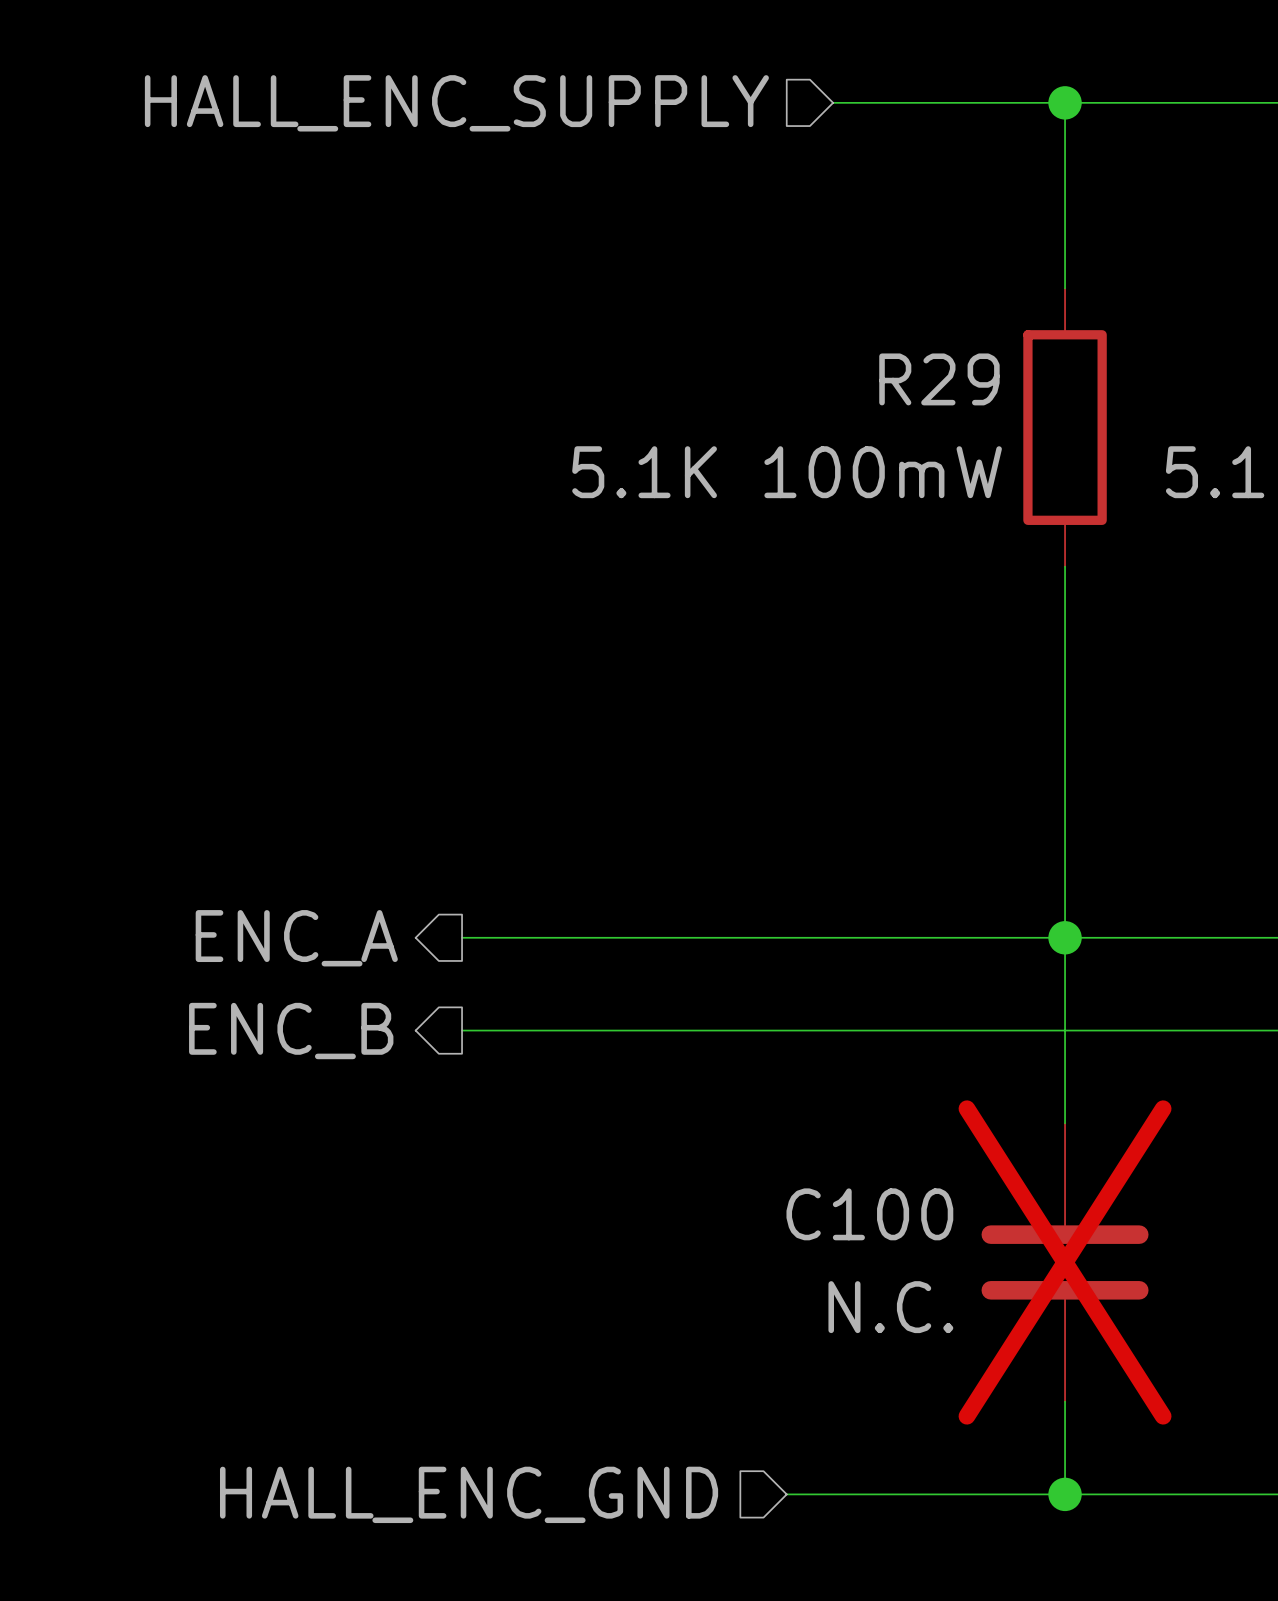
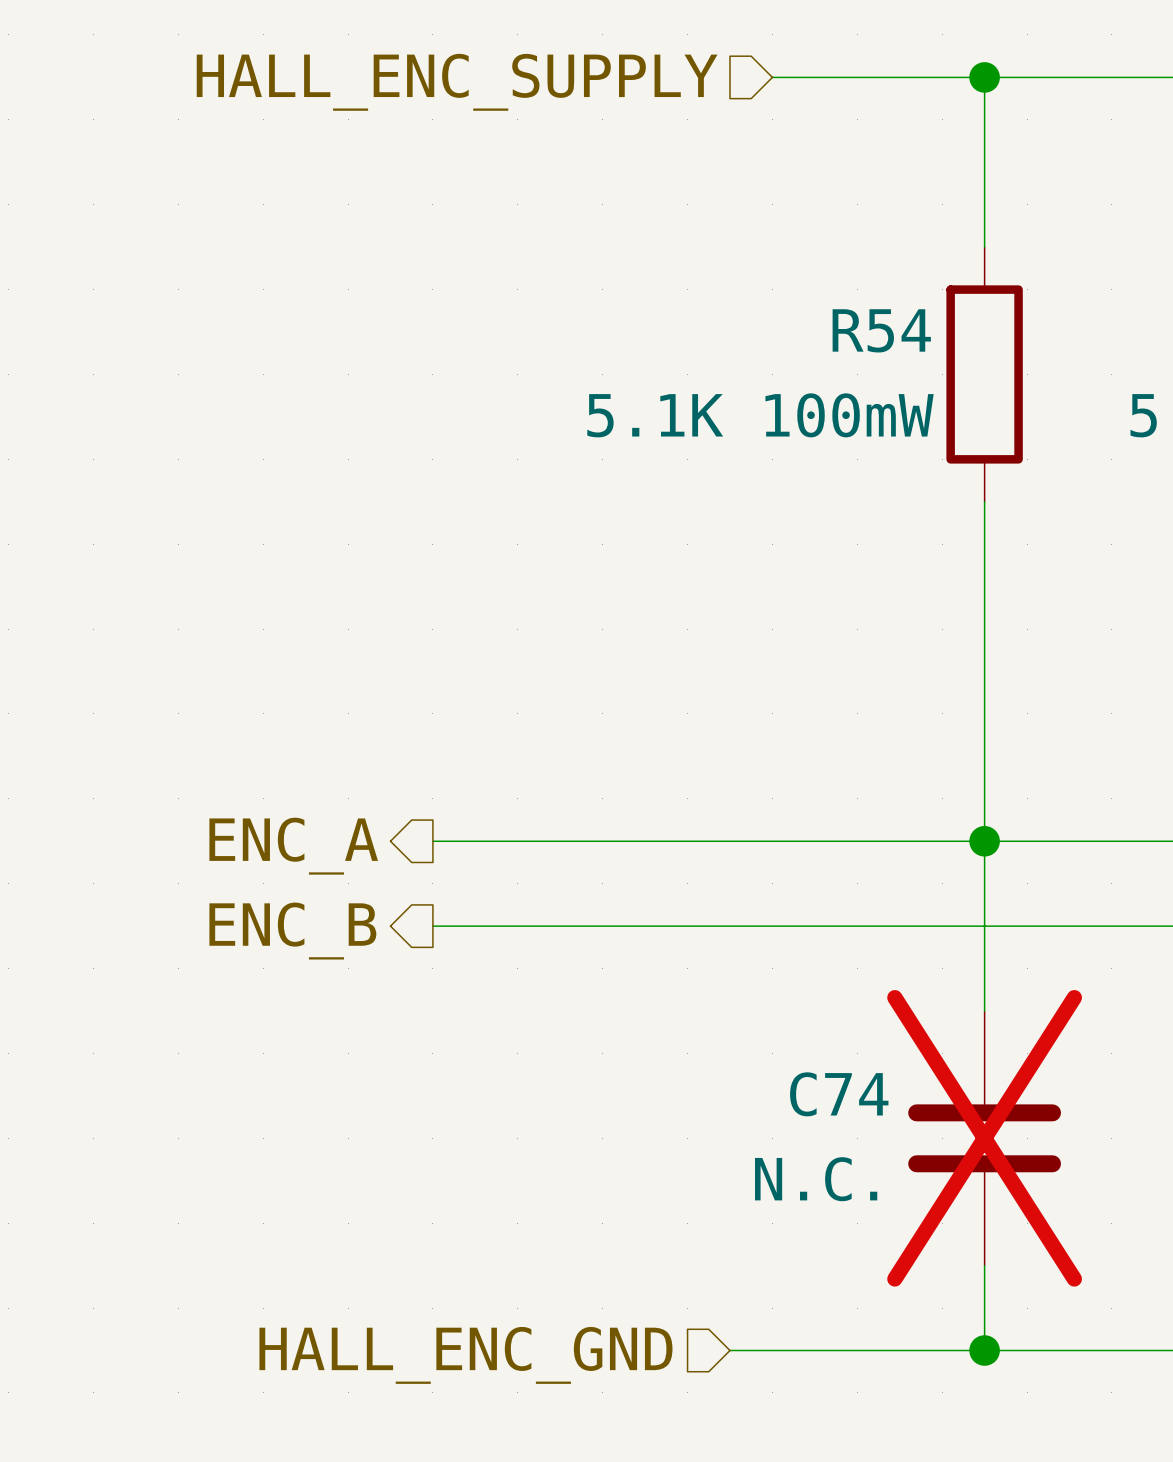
R29 name: R29 (939, 379) -> R54 (881, 330)
C100 name: C100 (869, 1214) -> C74 (839, 1094)

